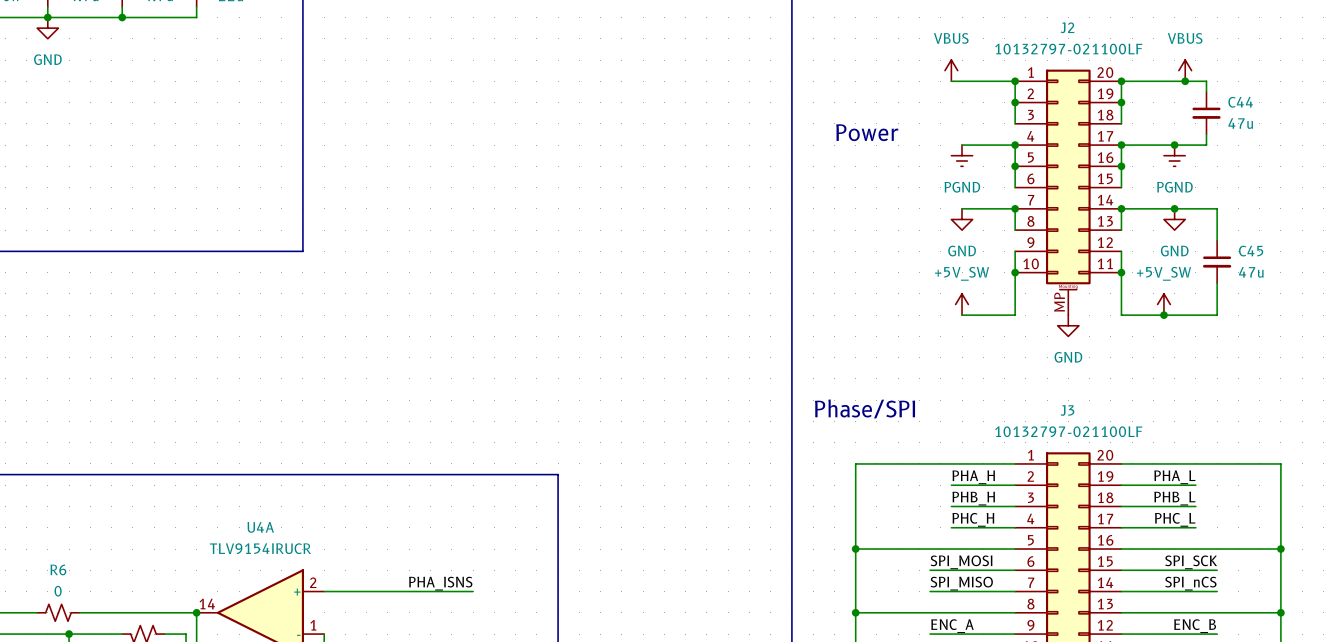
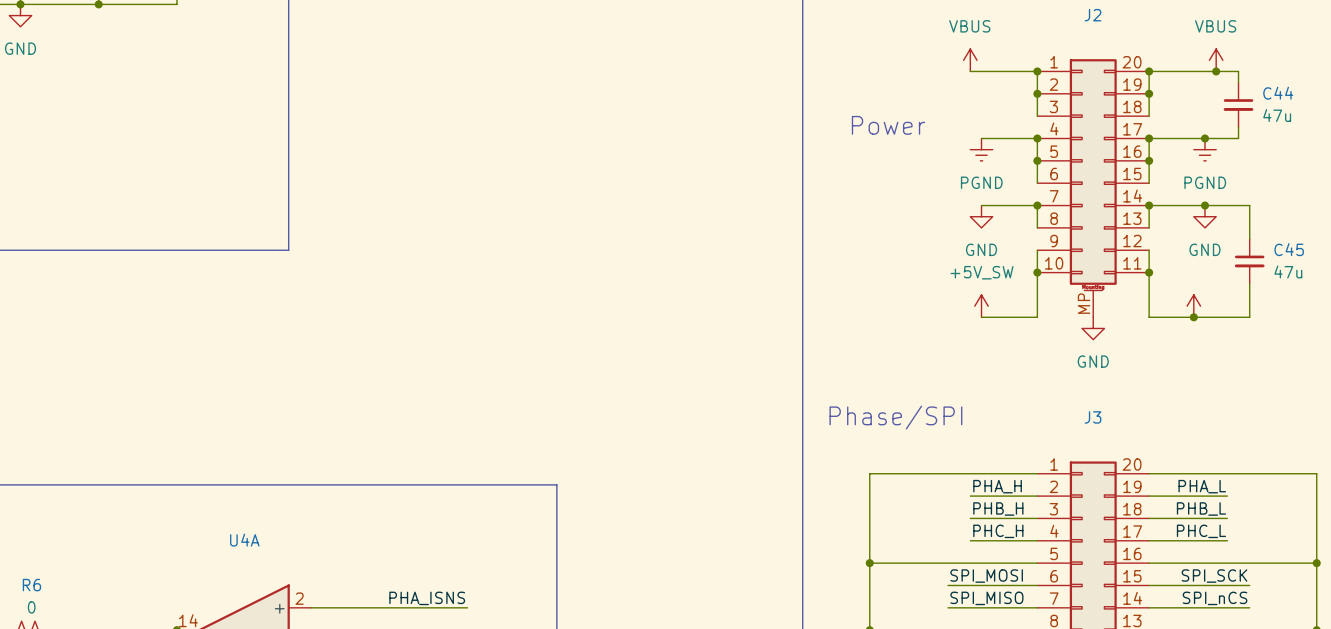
J2 value: 10132797-021100LF (1068, 49) -> none
power symbol text: +5V_SW (1164, 273) -> none
J3 value: 10132797-021100LF (1068, 431) -> none
U4A value: TLV9154IRUCR (260, 548) -> none

